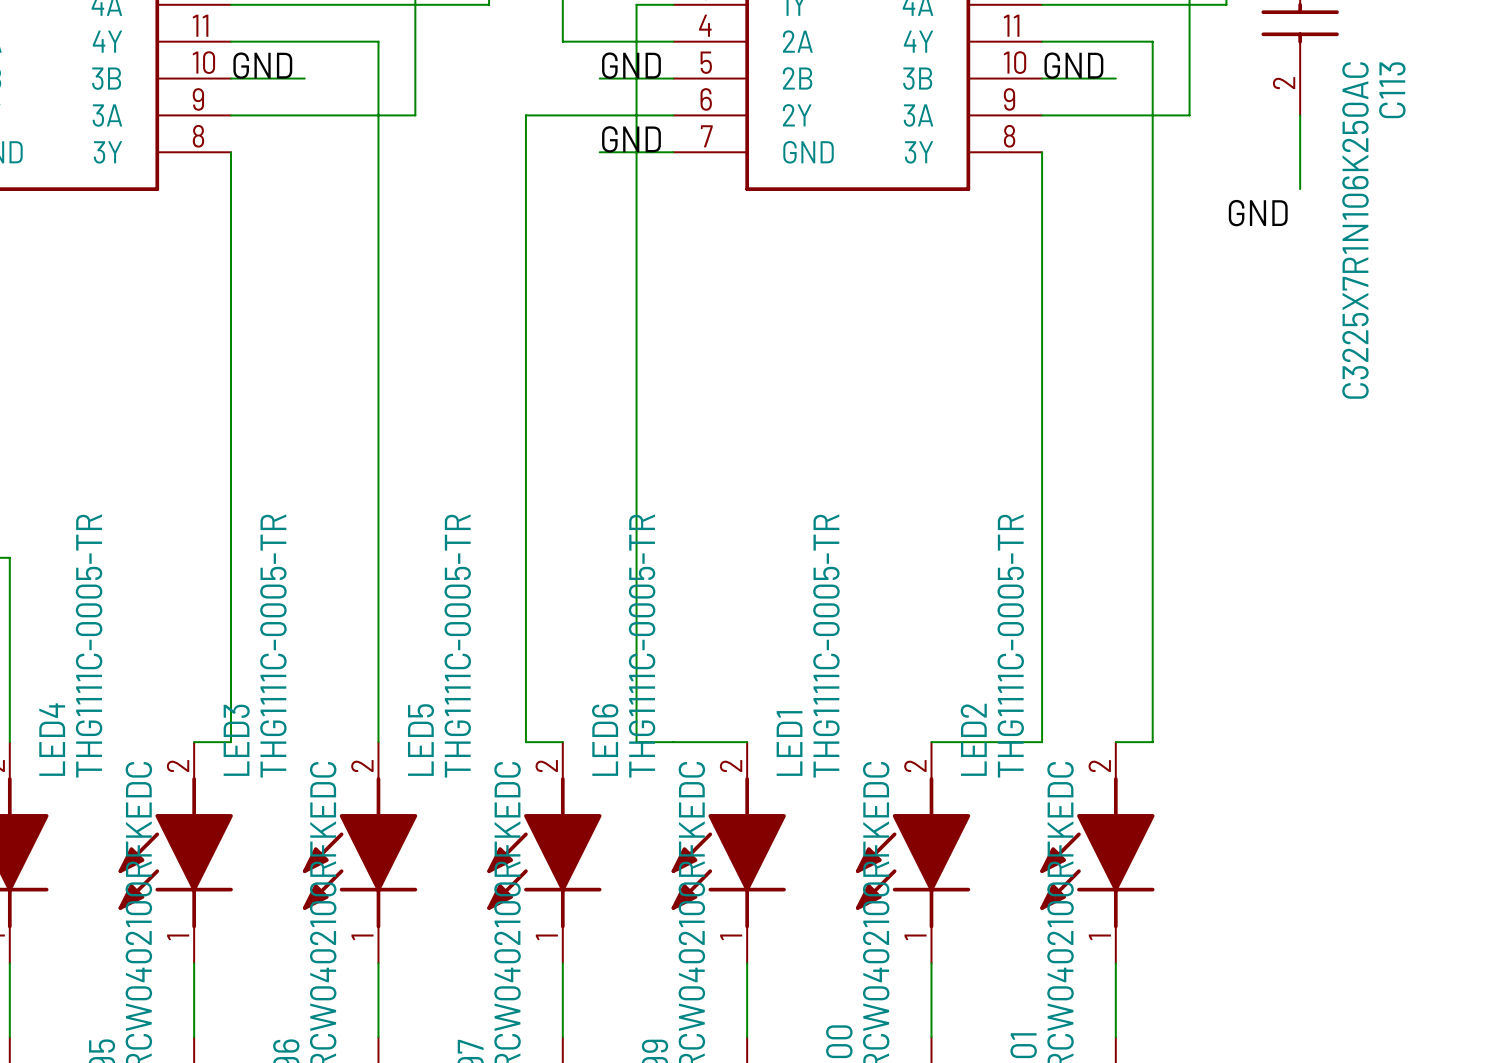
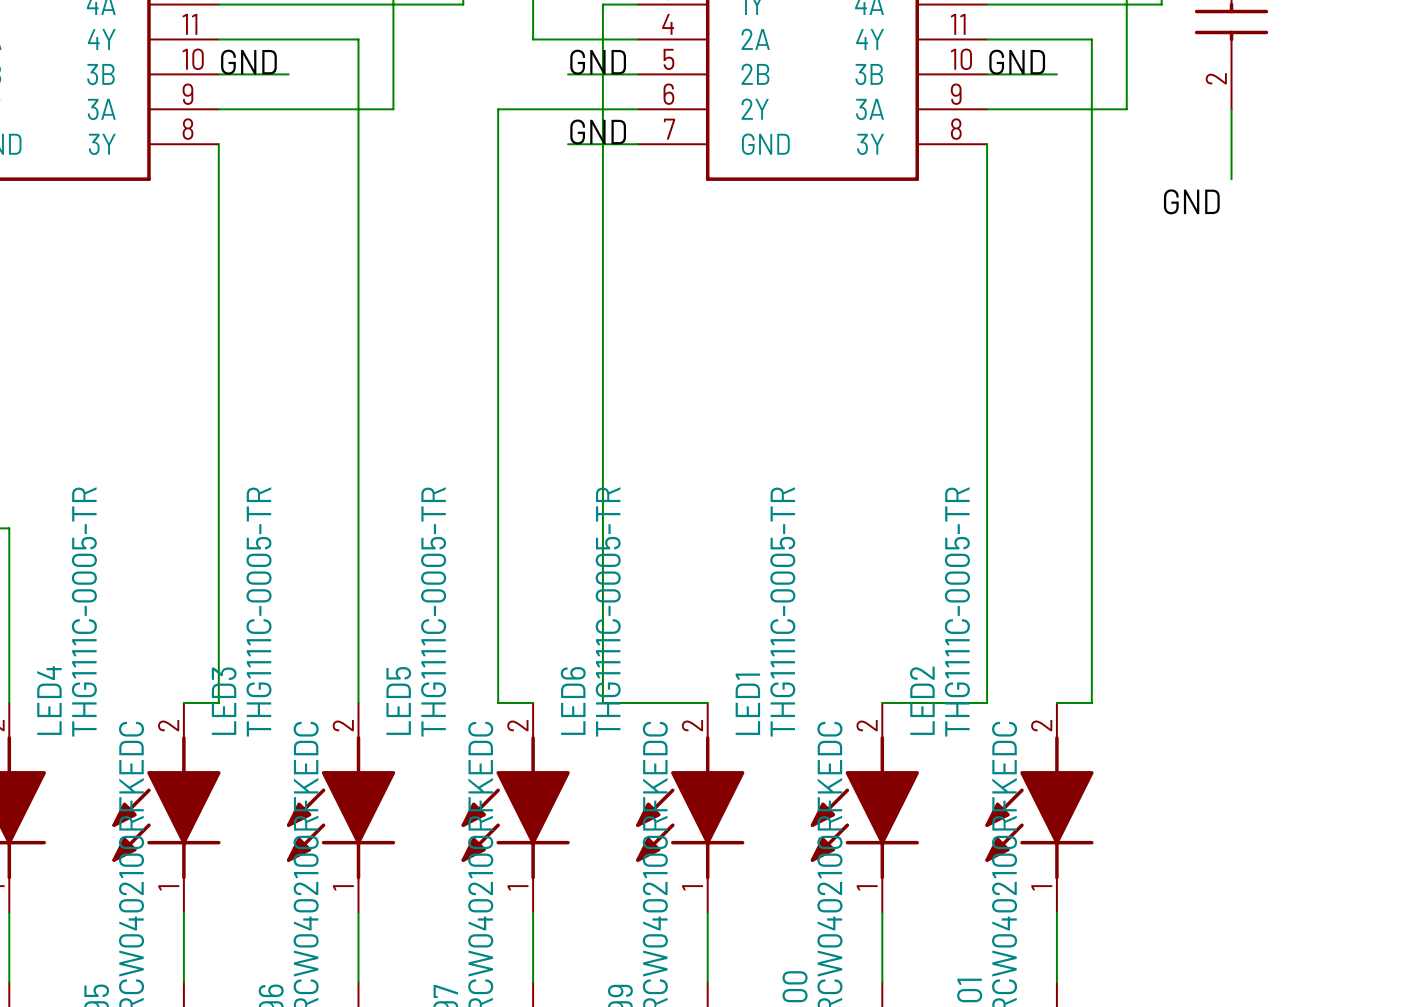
C113 name: C113 (1392, 90) -> none
C113 value: C3225X7R1N106K250AC (1355, 230) -> none

